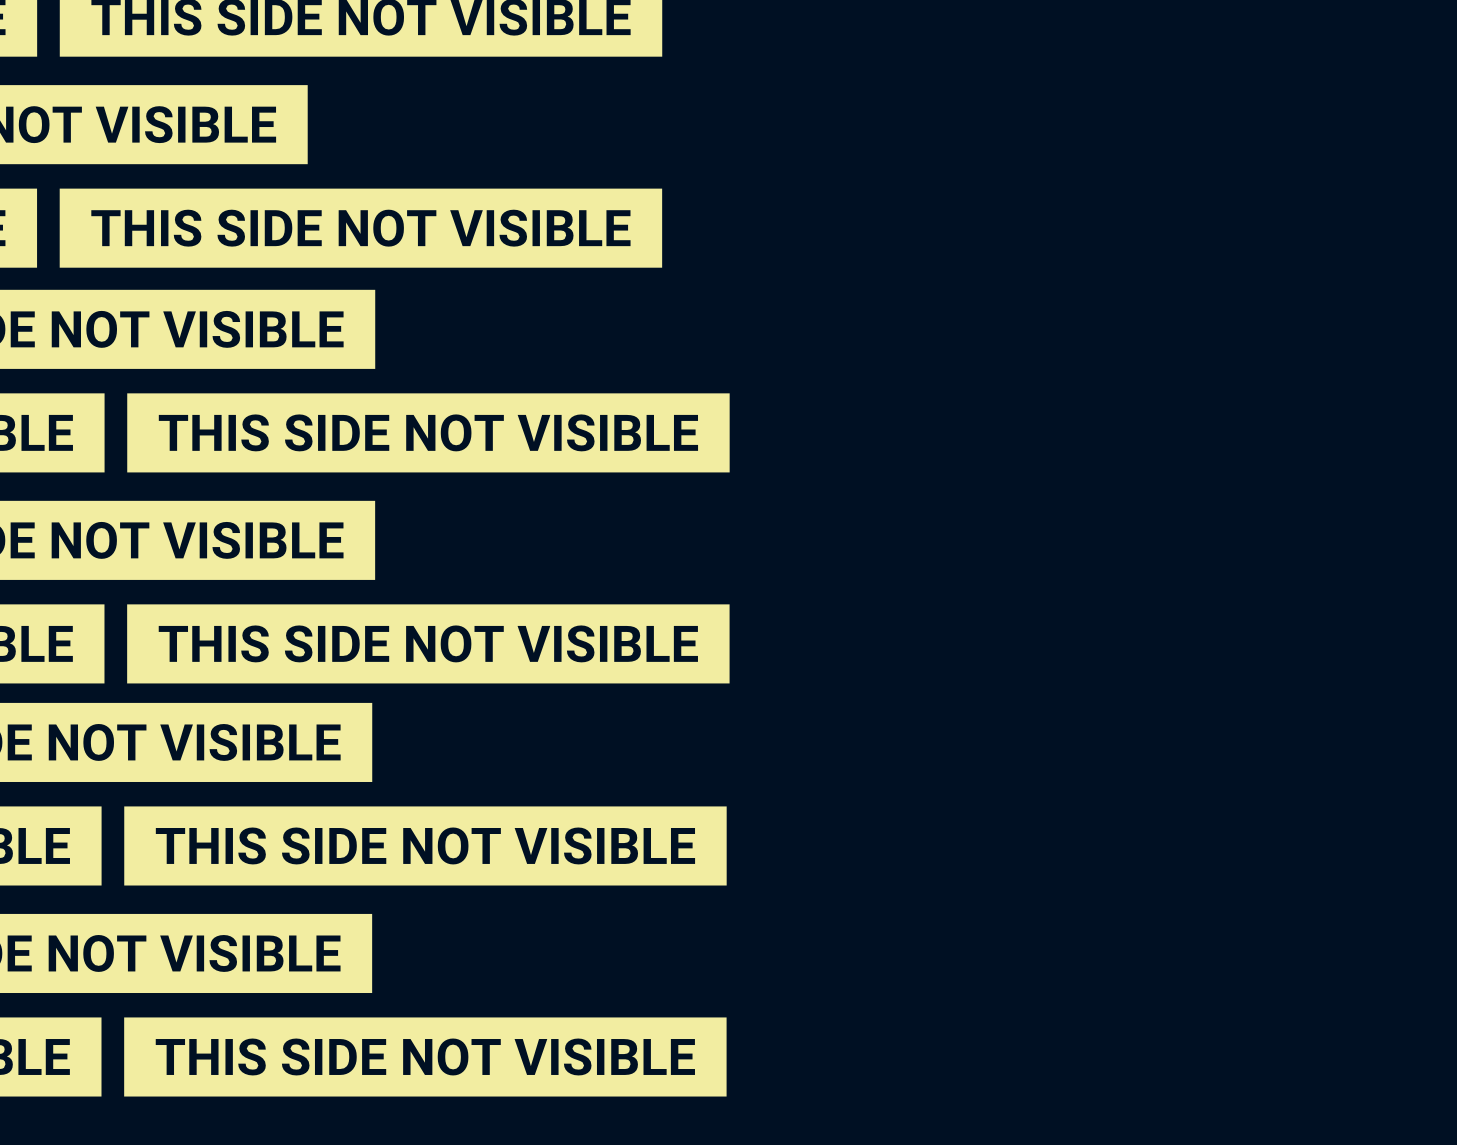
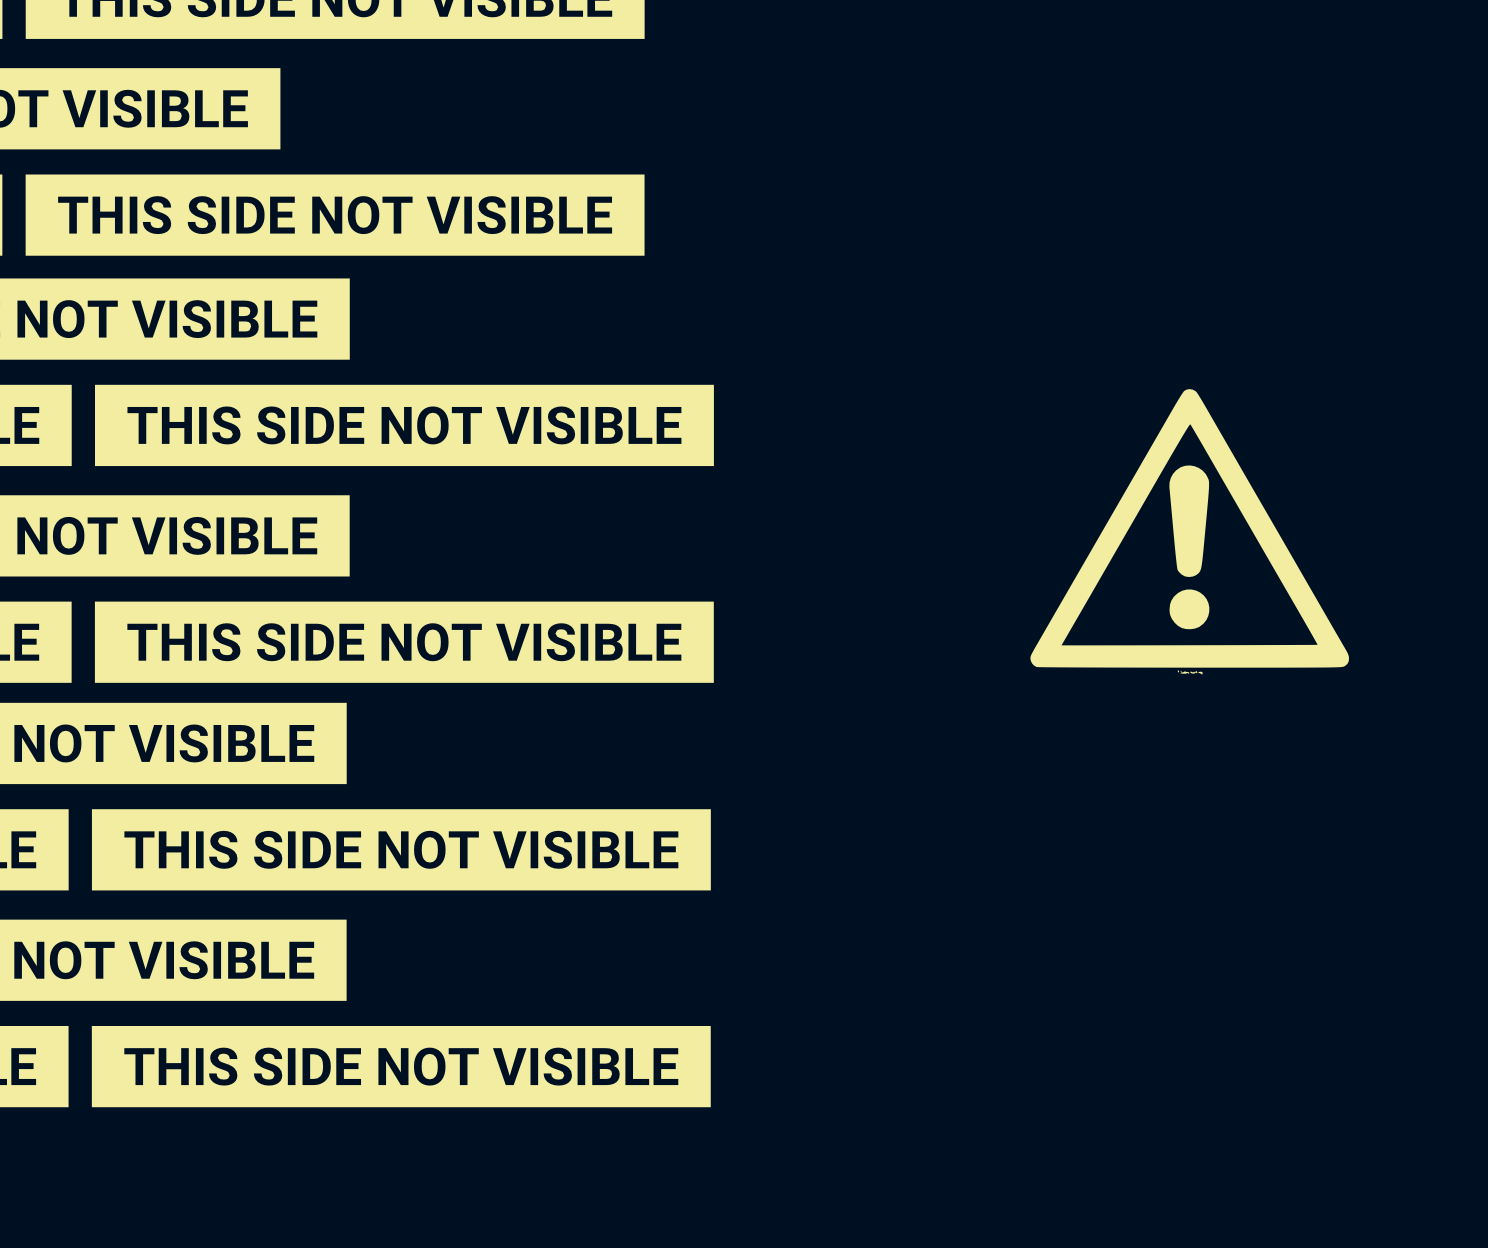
drawing: none -> [1030, 389, 1350, 675]

